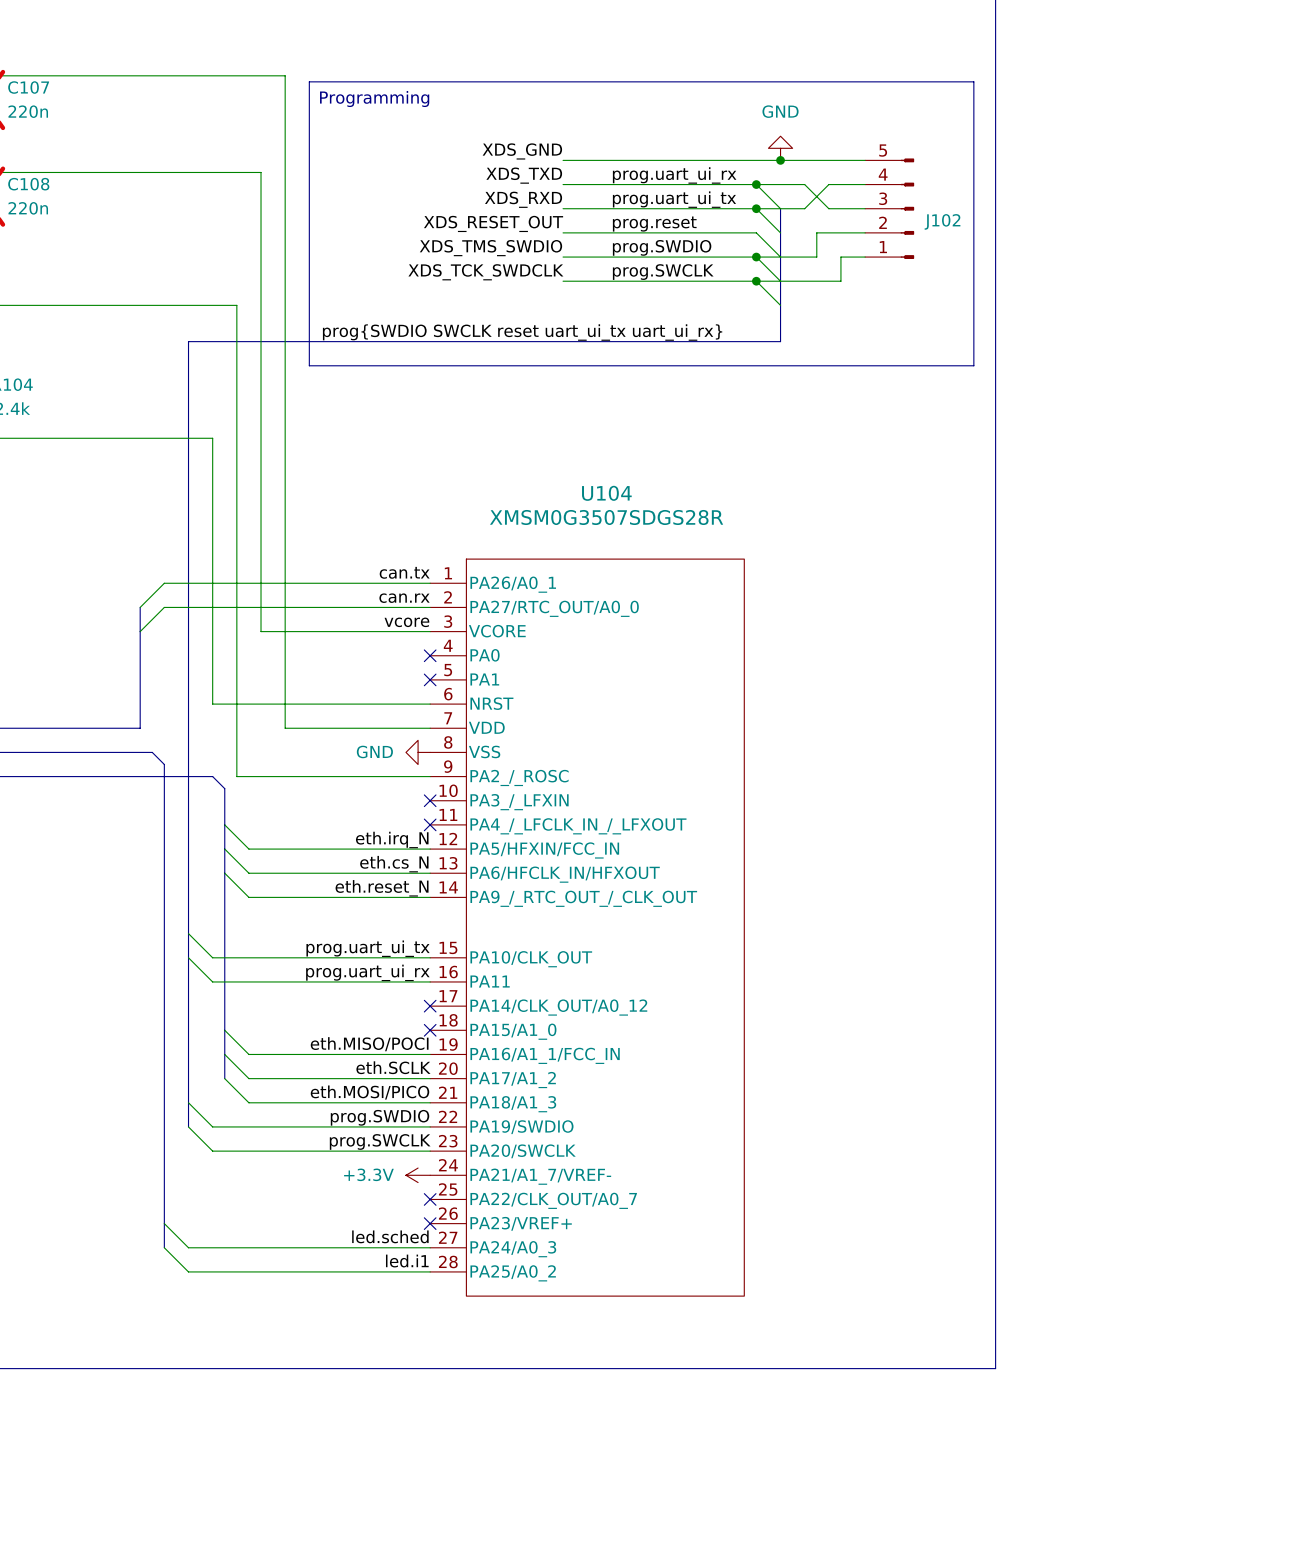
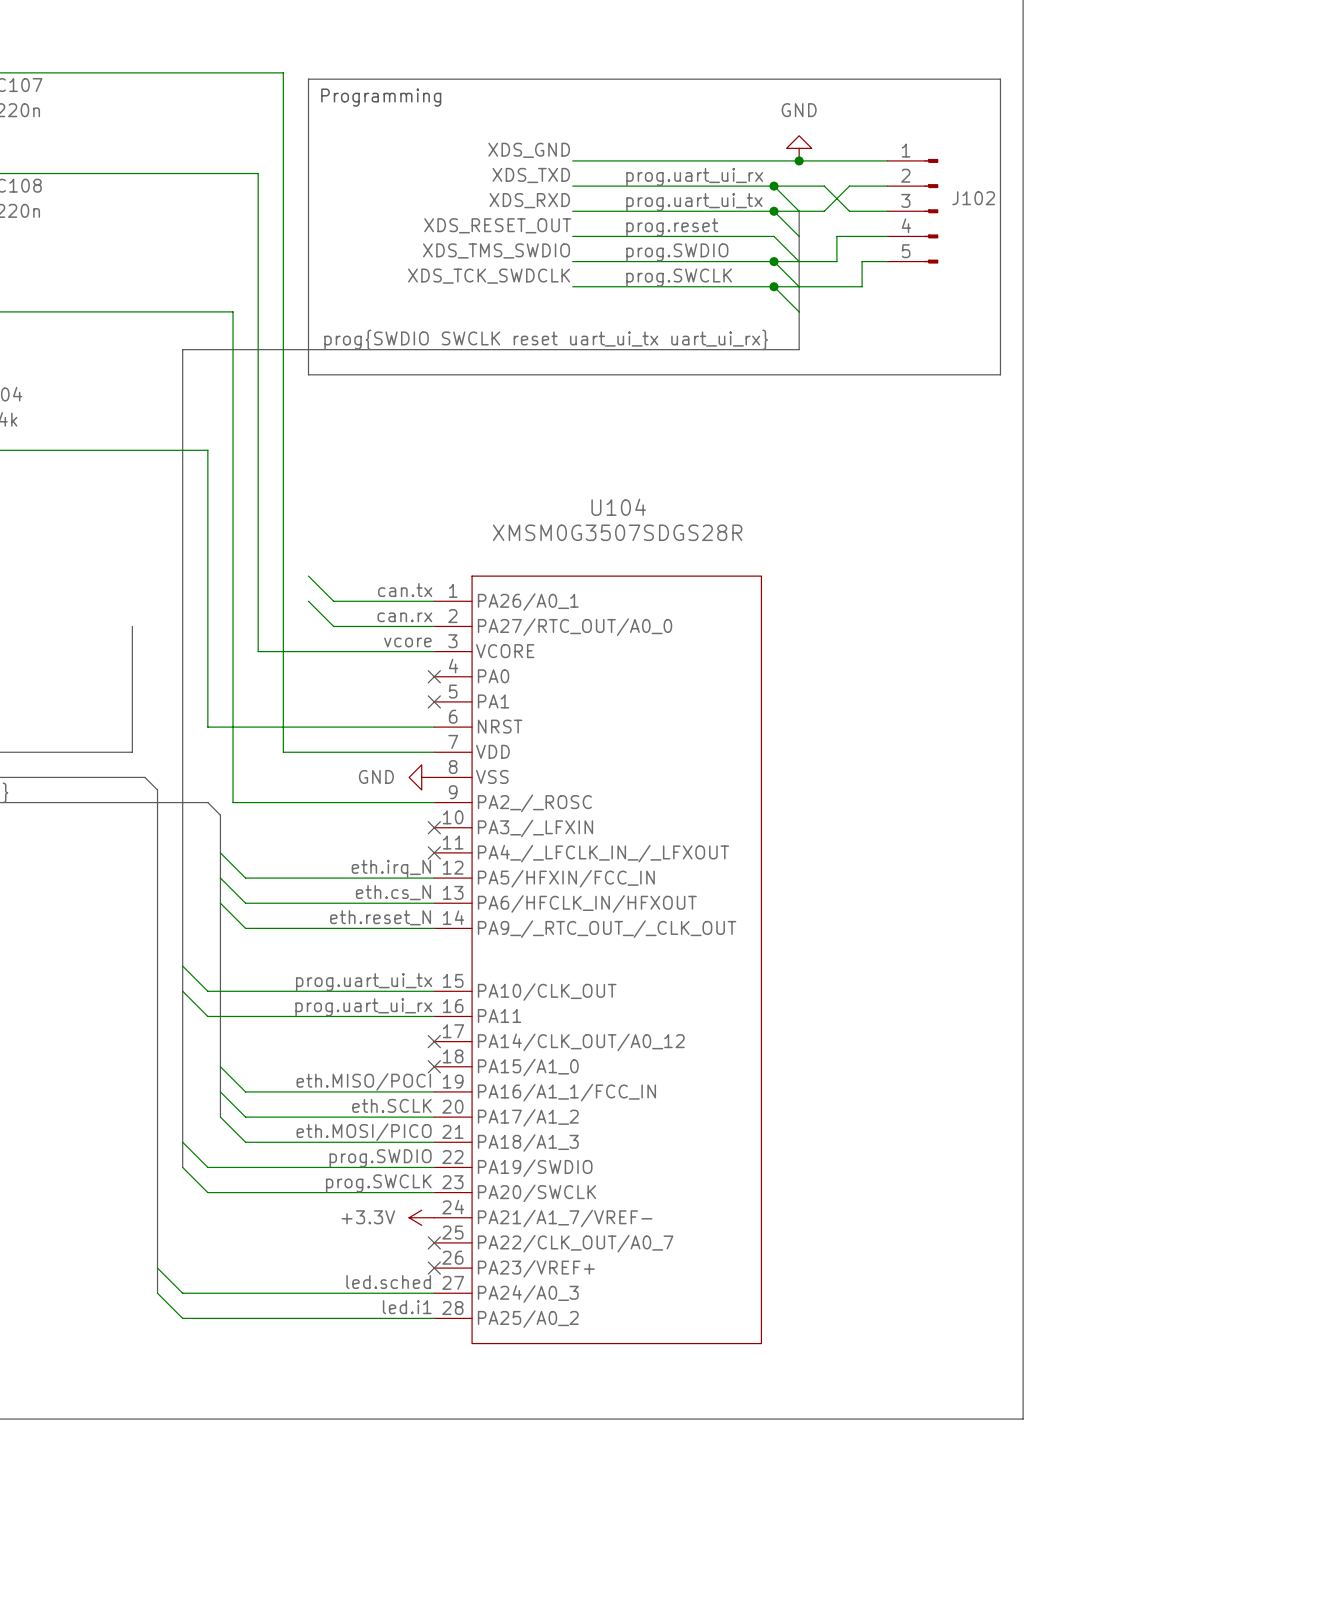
J102 flip: as is (907, 208) -> up-down (931, 211)
wire: (333, 583) (164, 583) (140, 607) -> (333, 601) (308, 576)
wire: (333, 607) (164, 607) (140, 631) -> (333, 626) (308, 601)

